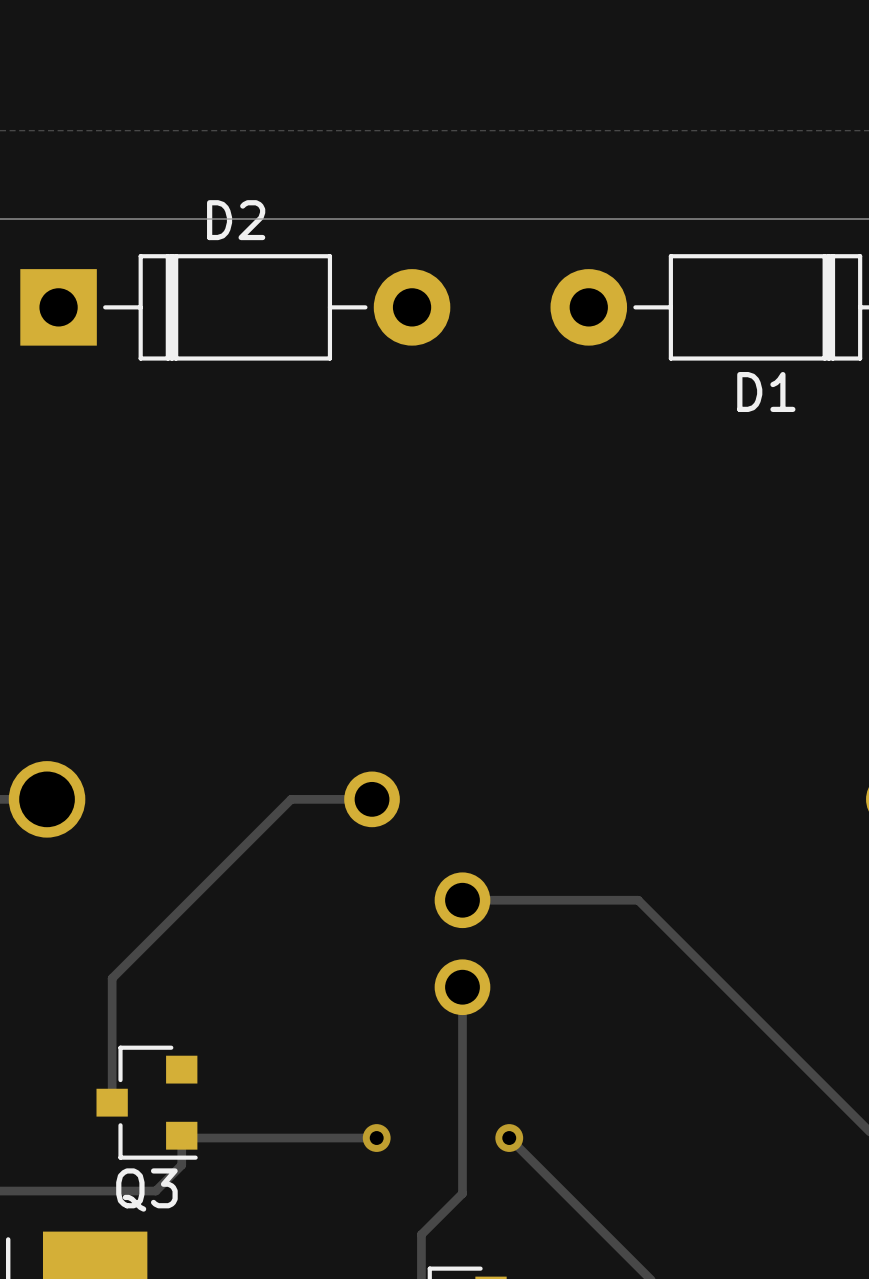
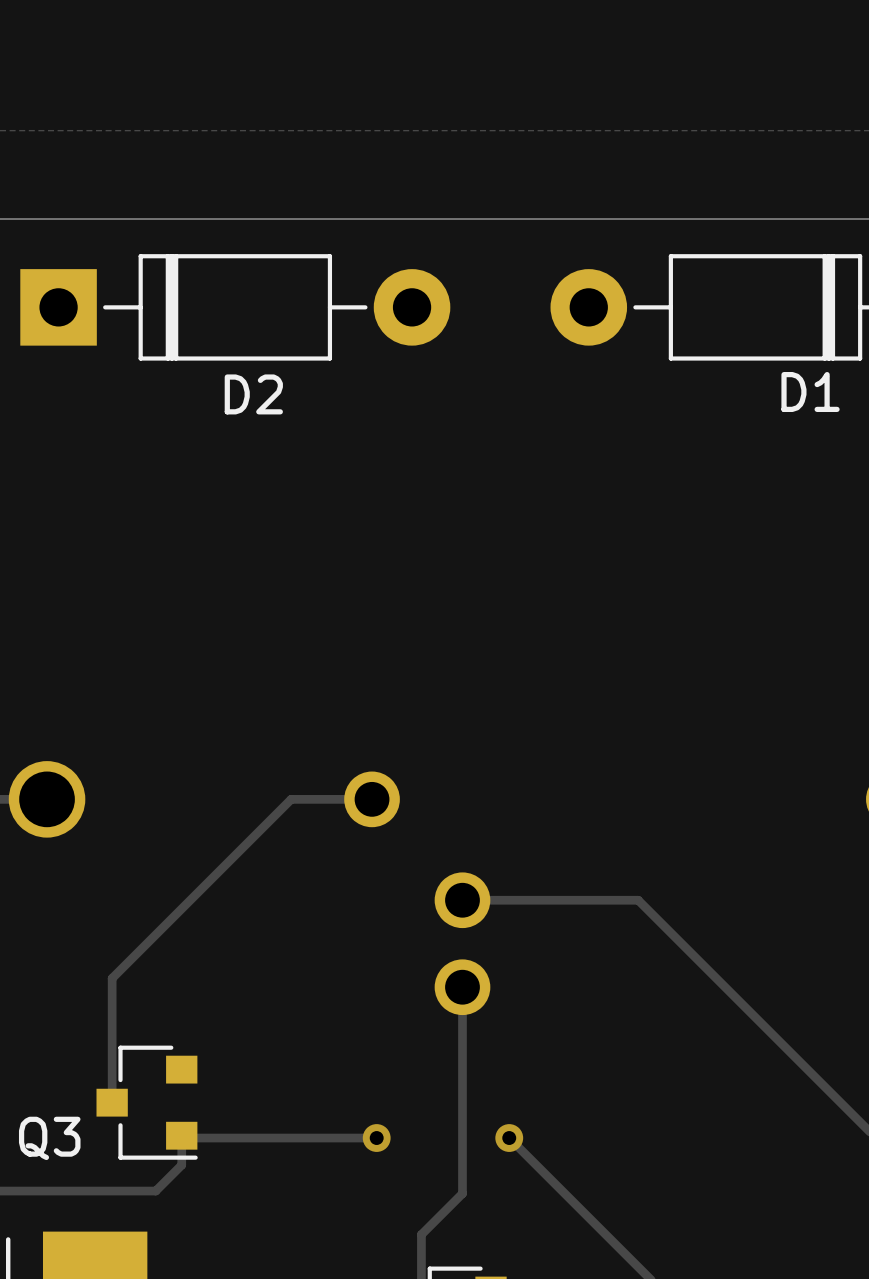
D2 name position: D2 (236, 220) -> D2 (253, 394)
D1 name position: D1 (766, 392) -> D1 (810, 392)
Q3 name position: Q3 (146, 1190) -> Q3 (49, 1138)

